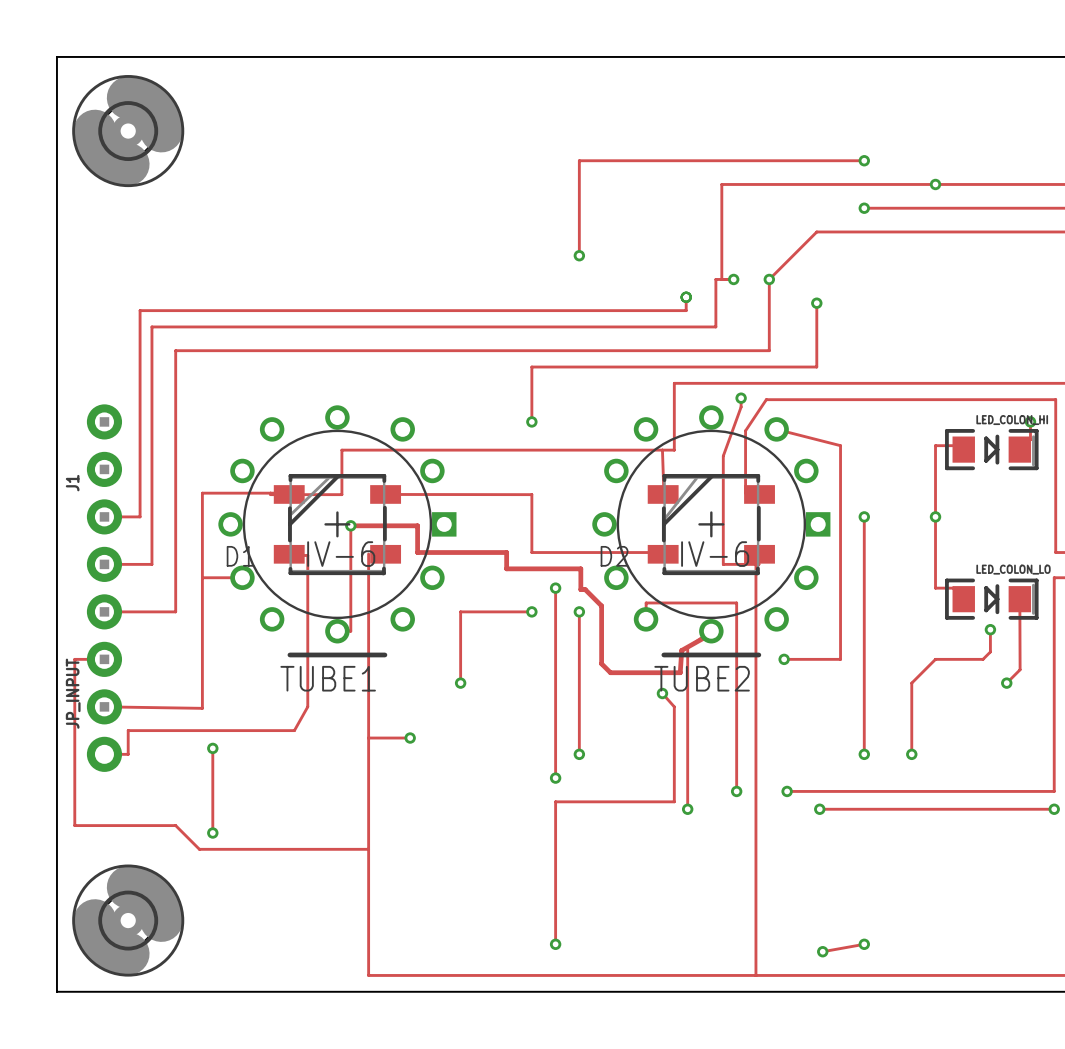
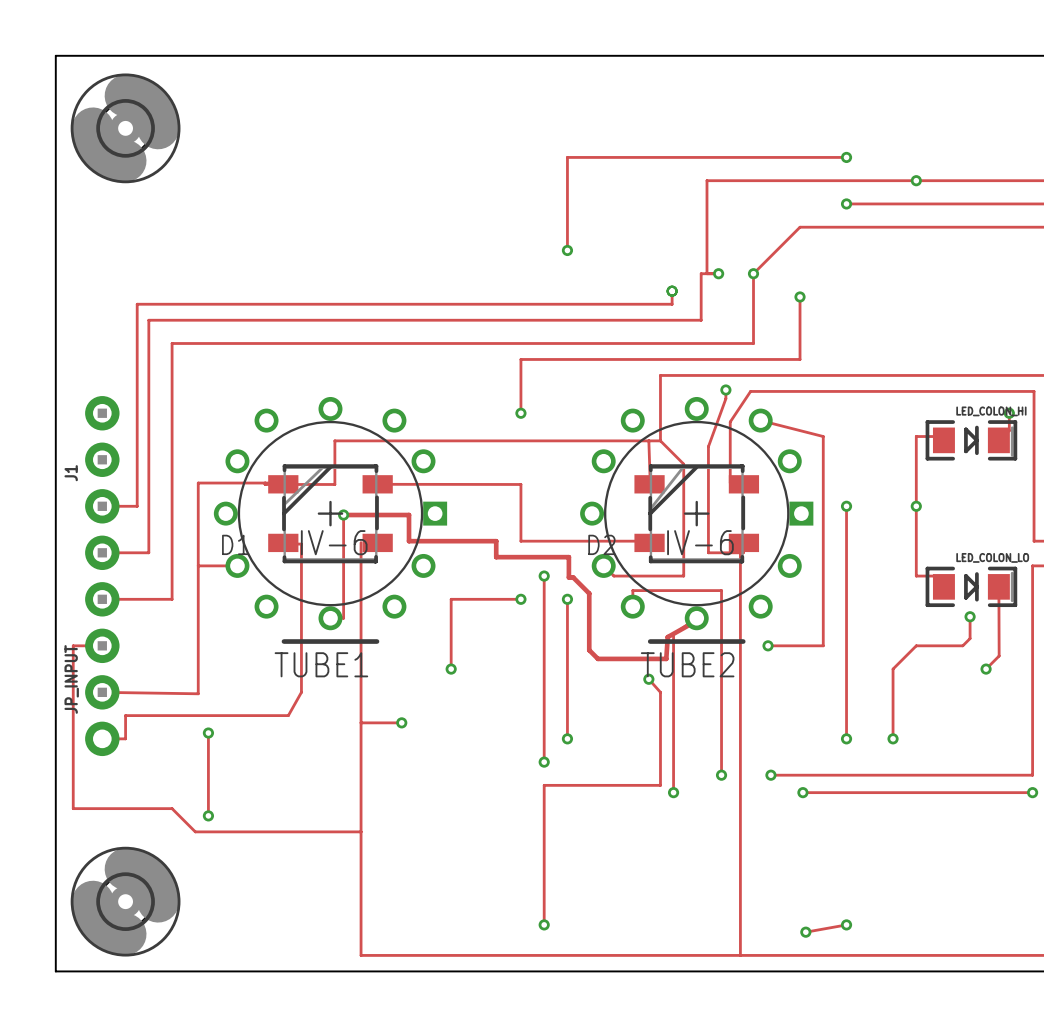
track: none -> (660, 440) (683, 464) (683, 576) (613, 576) (603, 565)

